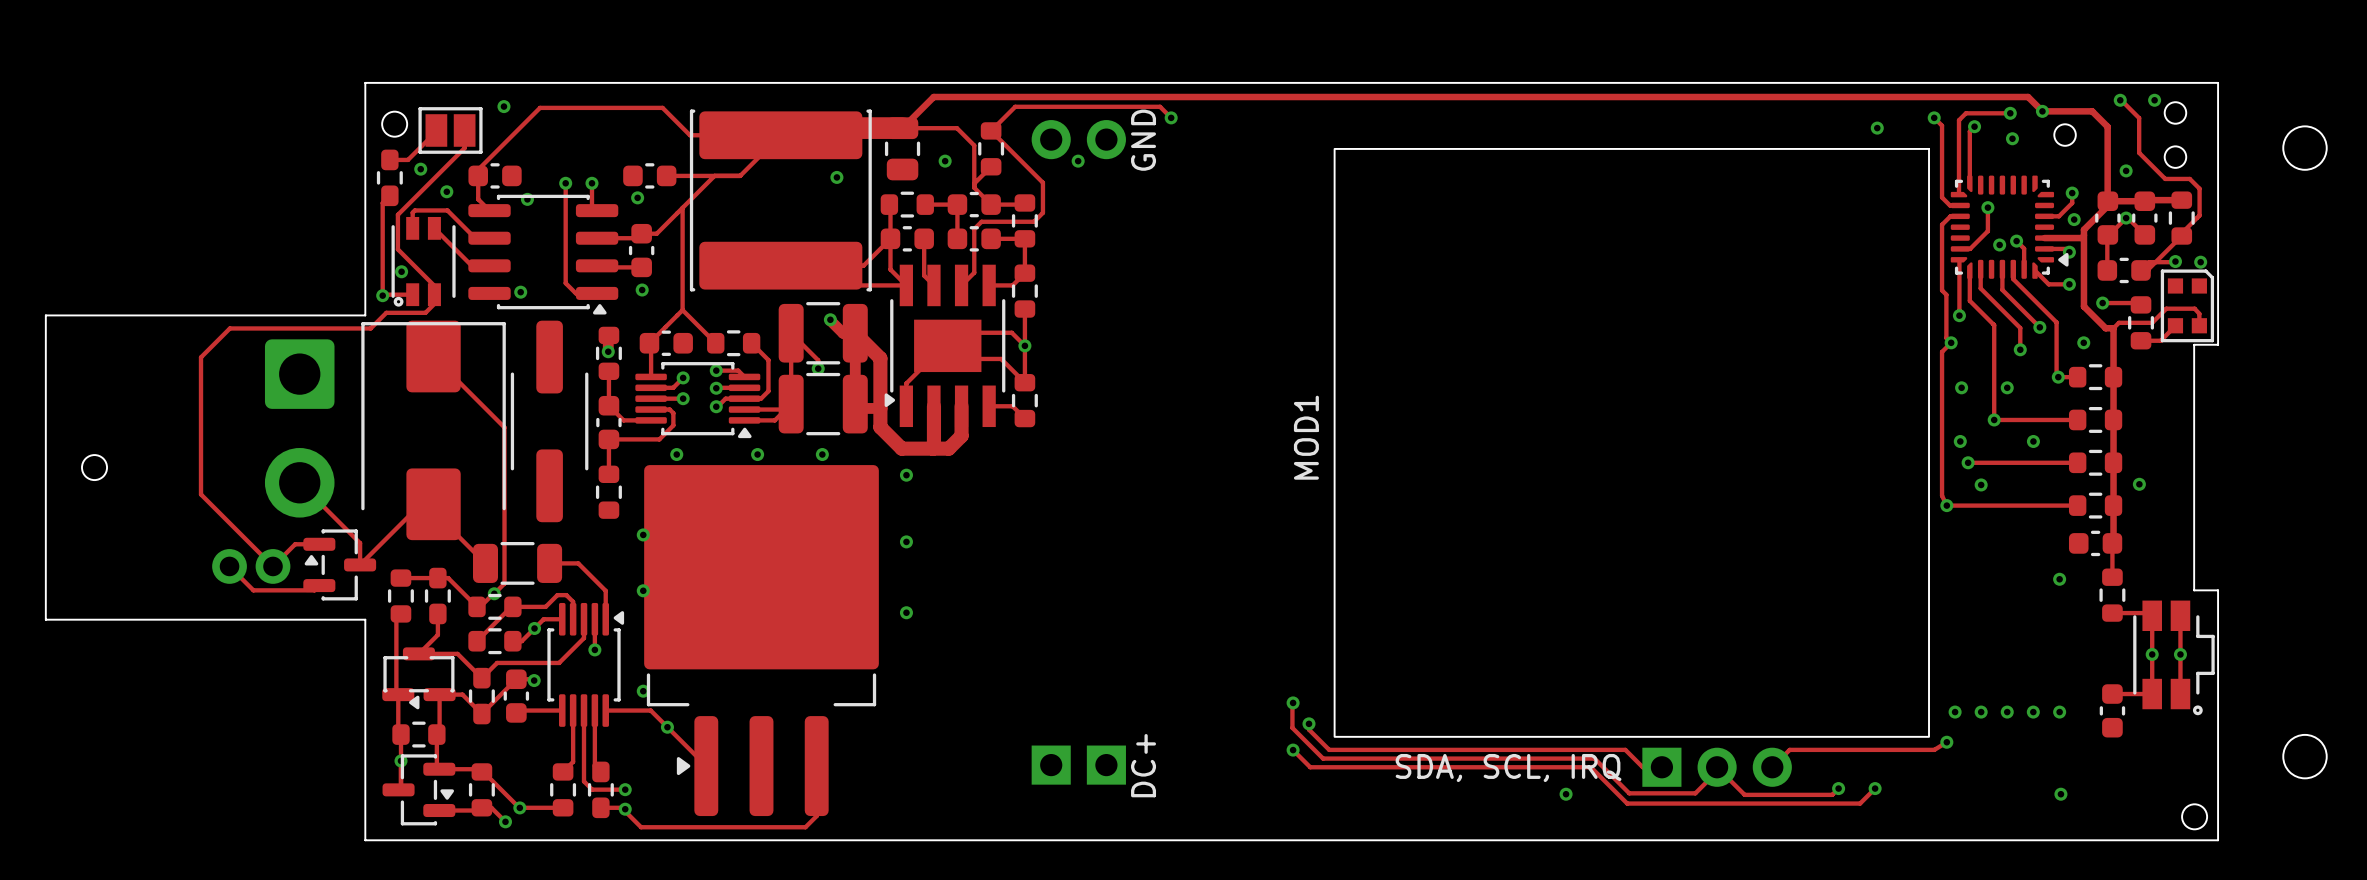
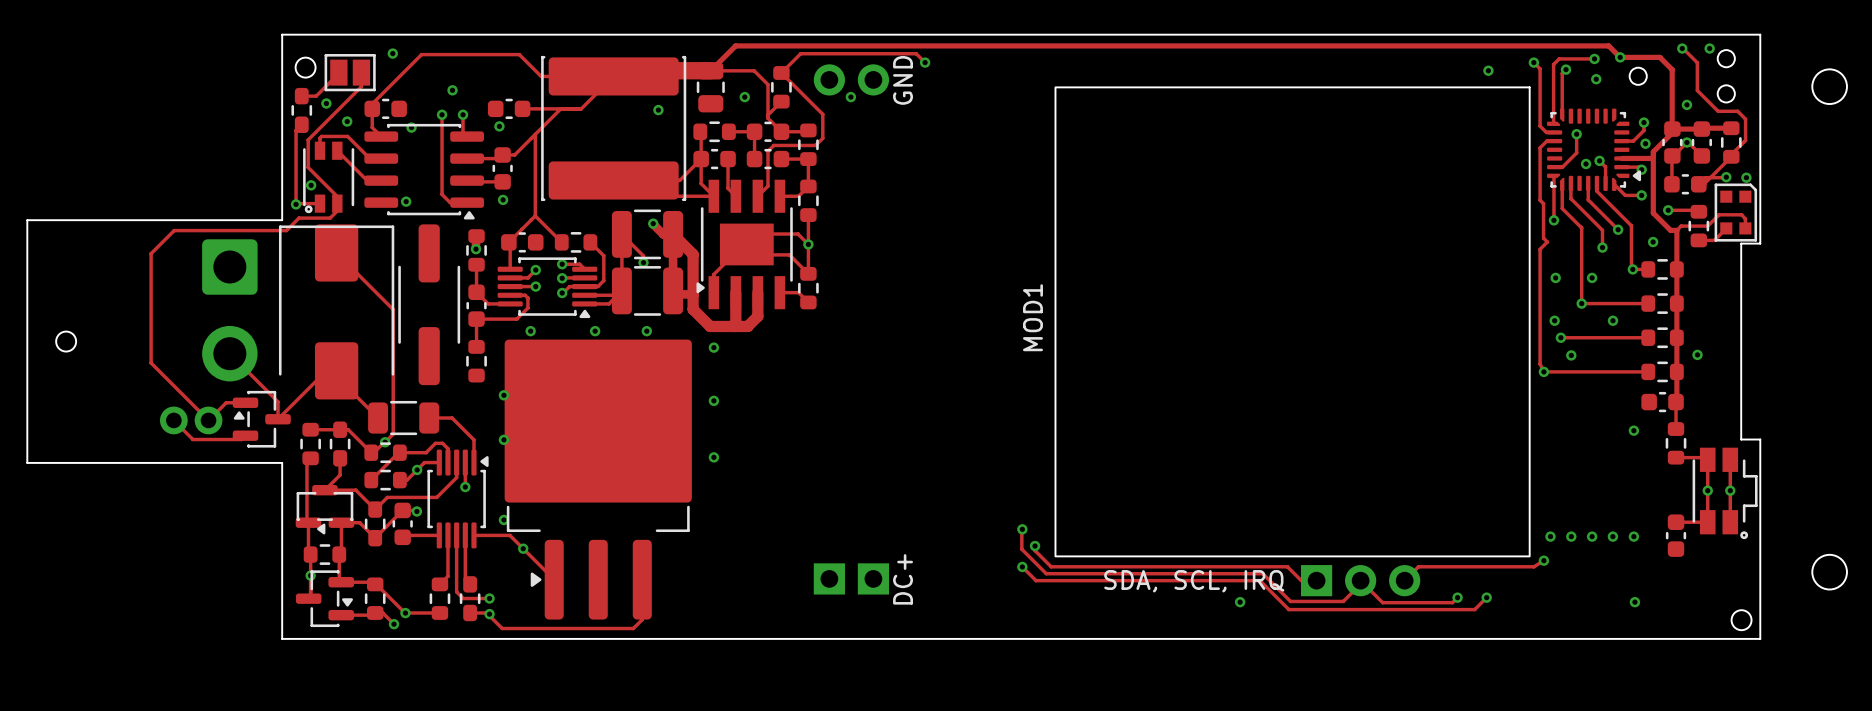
via: none -> (452, 90)
via: (1951, 342) -> none

